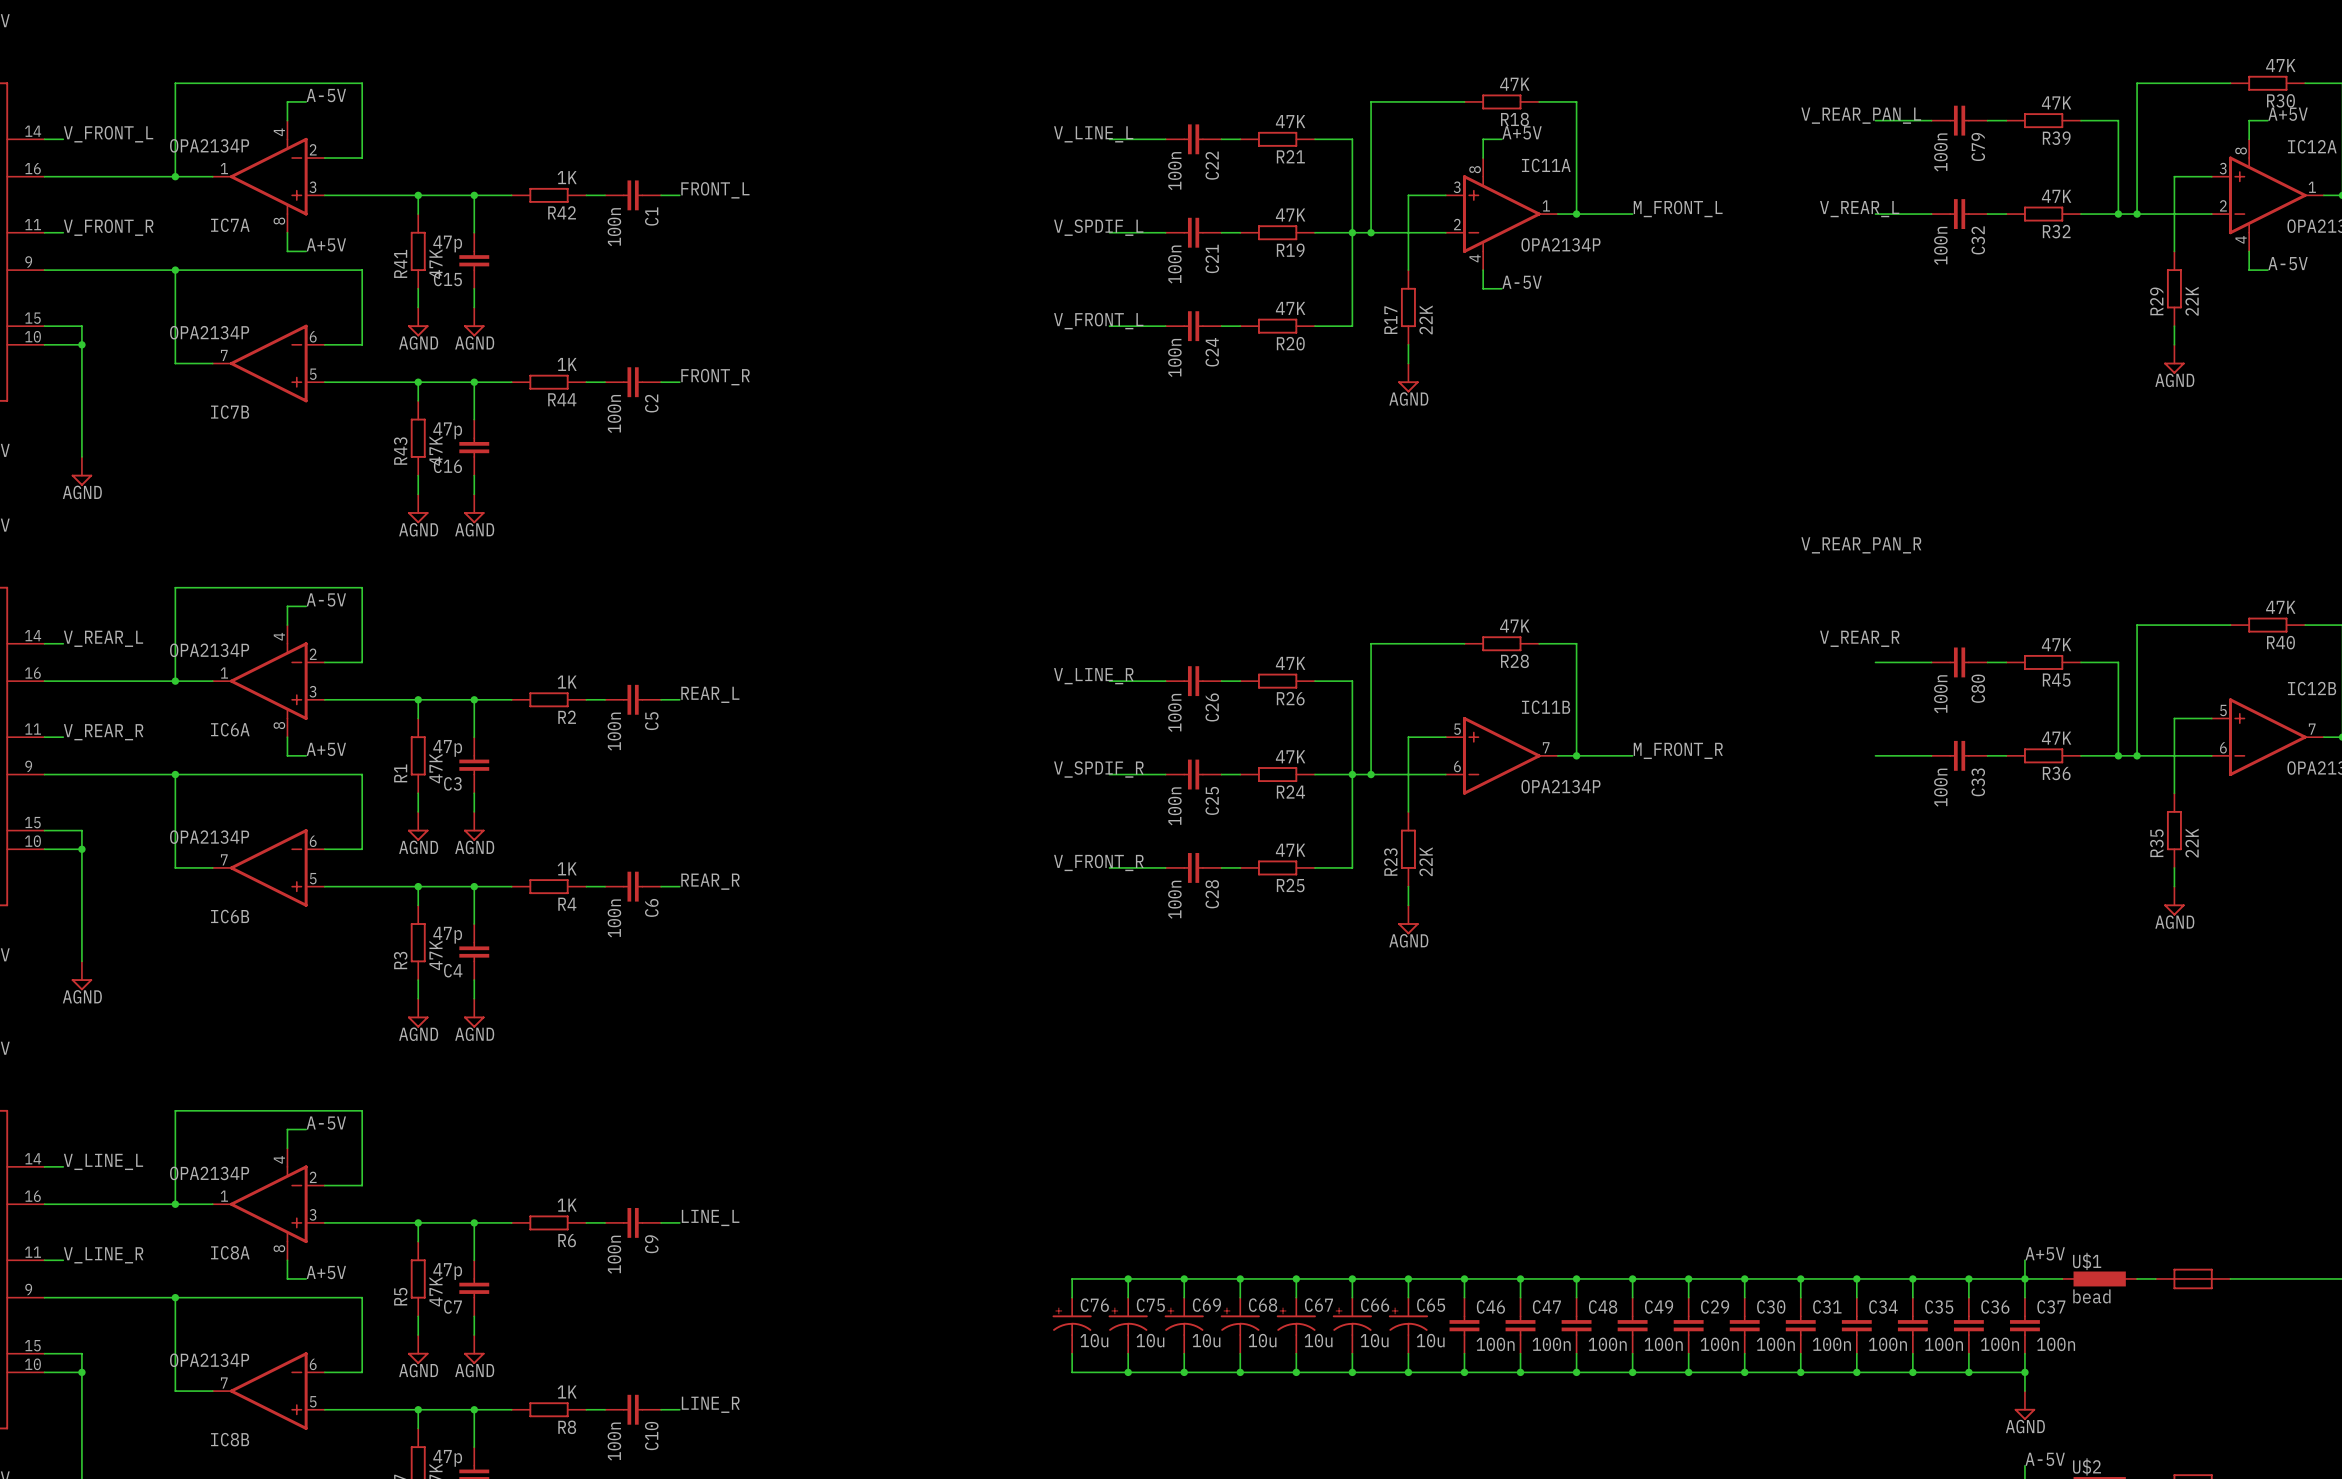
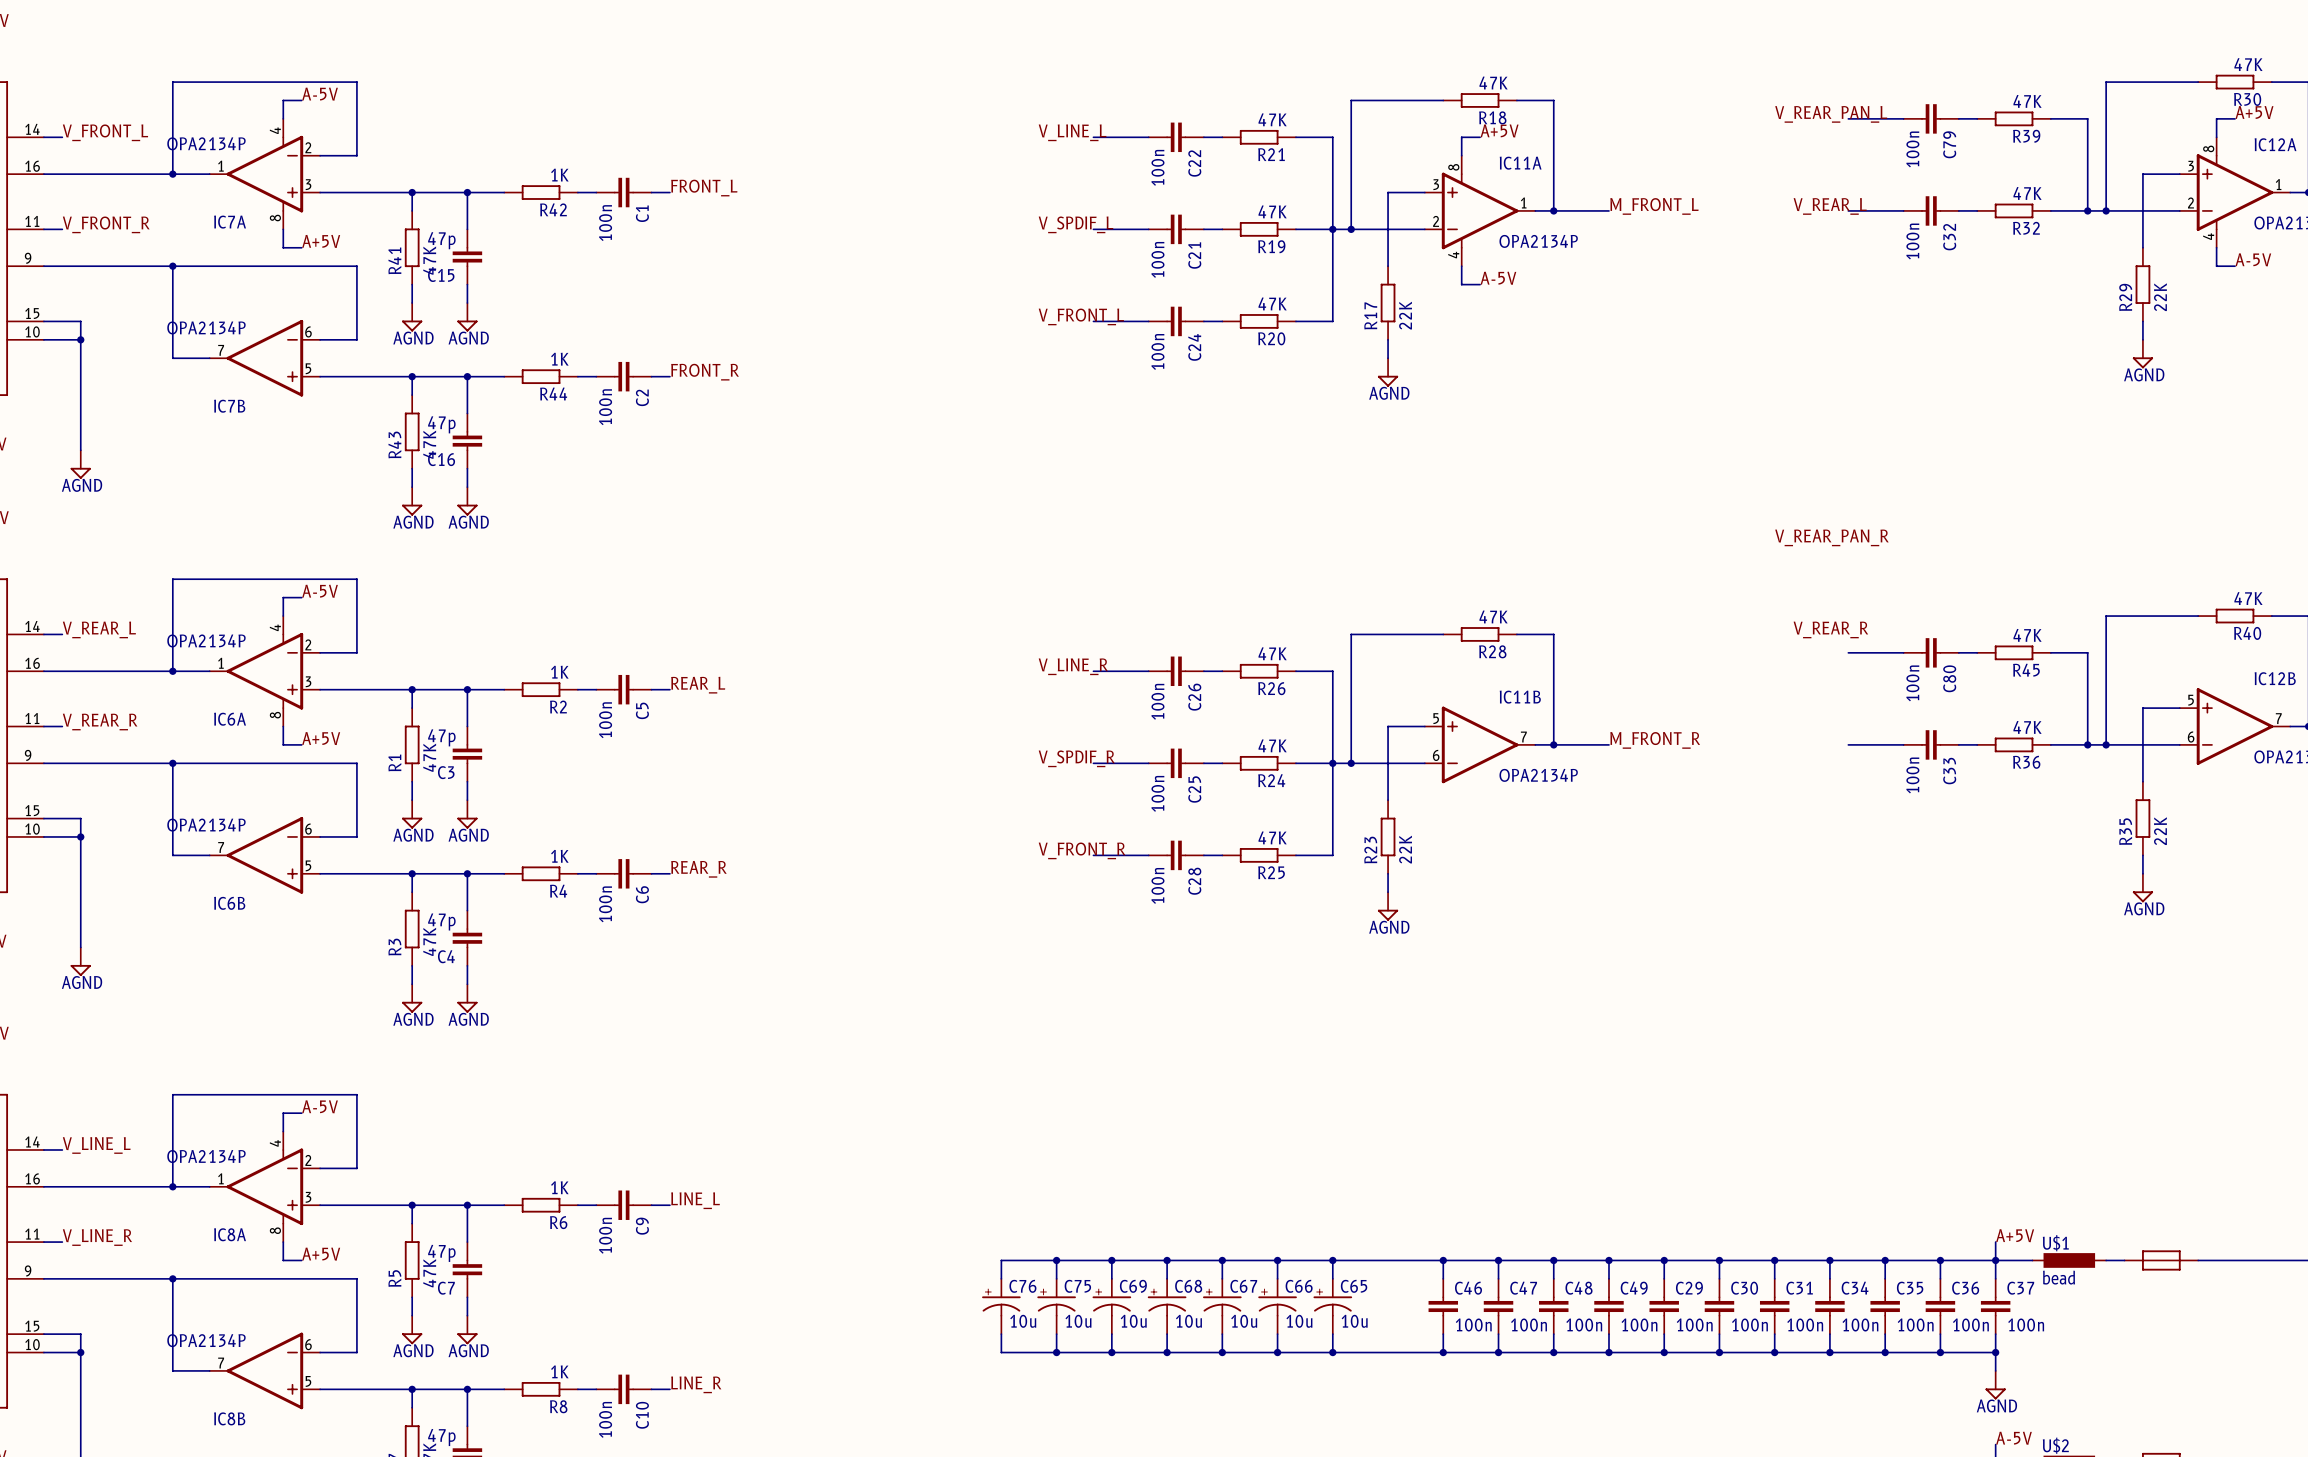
wire: none -> (1056, 1260) (1001, 1260) (1001, 1278)
junction: none -> (1056, 1260)
wire: (1408, 1278) (1408, 1297) -> none
junction: (1408, 1278) -> none
C76 name: C76 (1094, 1305) -> C75 (1077, 1286)
C75 name: C75 (1150, 1305) -> C69 (1133, 1286)
C69 name: C69 (1206, 1305) -> C68 (1188, 1286)
C68 name: C68 (1263, 1305) -> C67 (1243, 1286)
C67 name: C67 (1318, 1305) -> C66 (1299, 1286)
C66 name: C66 (1375, 1305) -> C65 (1354, 1286)
C76: none -> 10u (1001, 1306)
C65: 10u (1408, 1325) -> none
wire: none -> (1001, 1334) (1001, 1352) (1056, 1352)
wire: (1408, 1353) (1408, 1372) -> none
junction: none -> (1056, 1352)
junction: (1408, 1372) -> none

